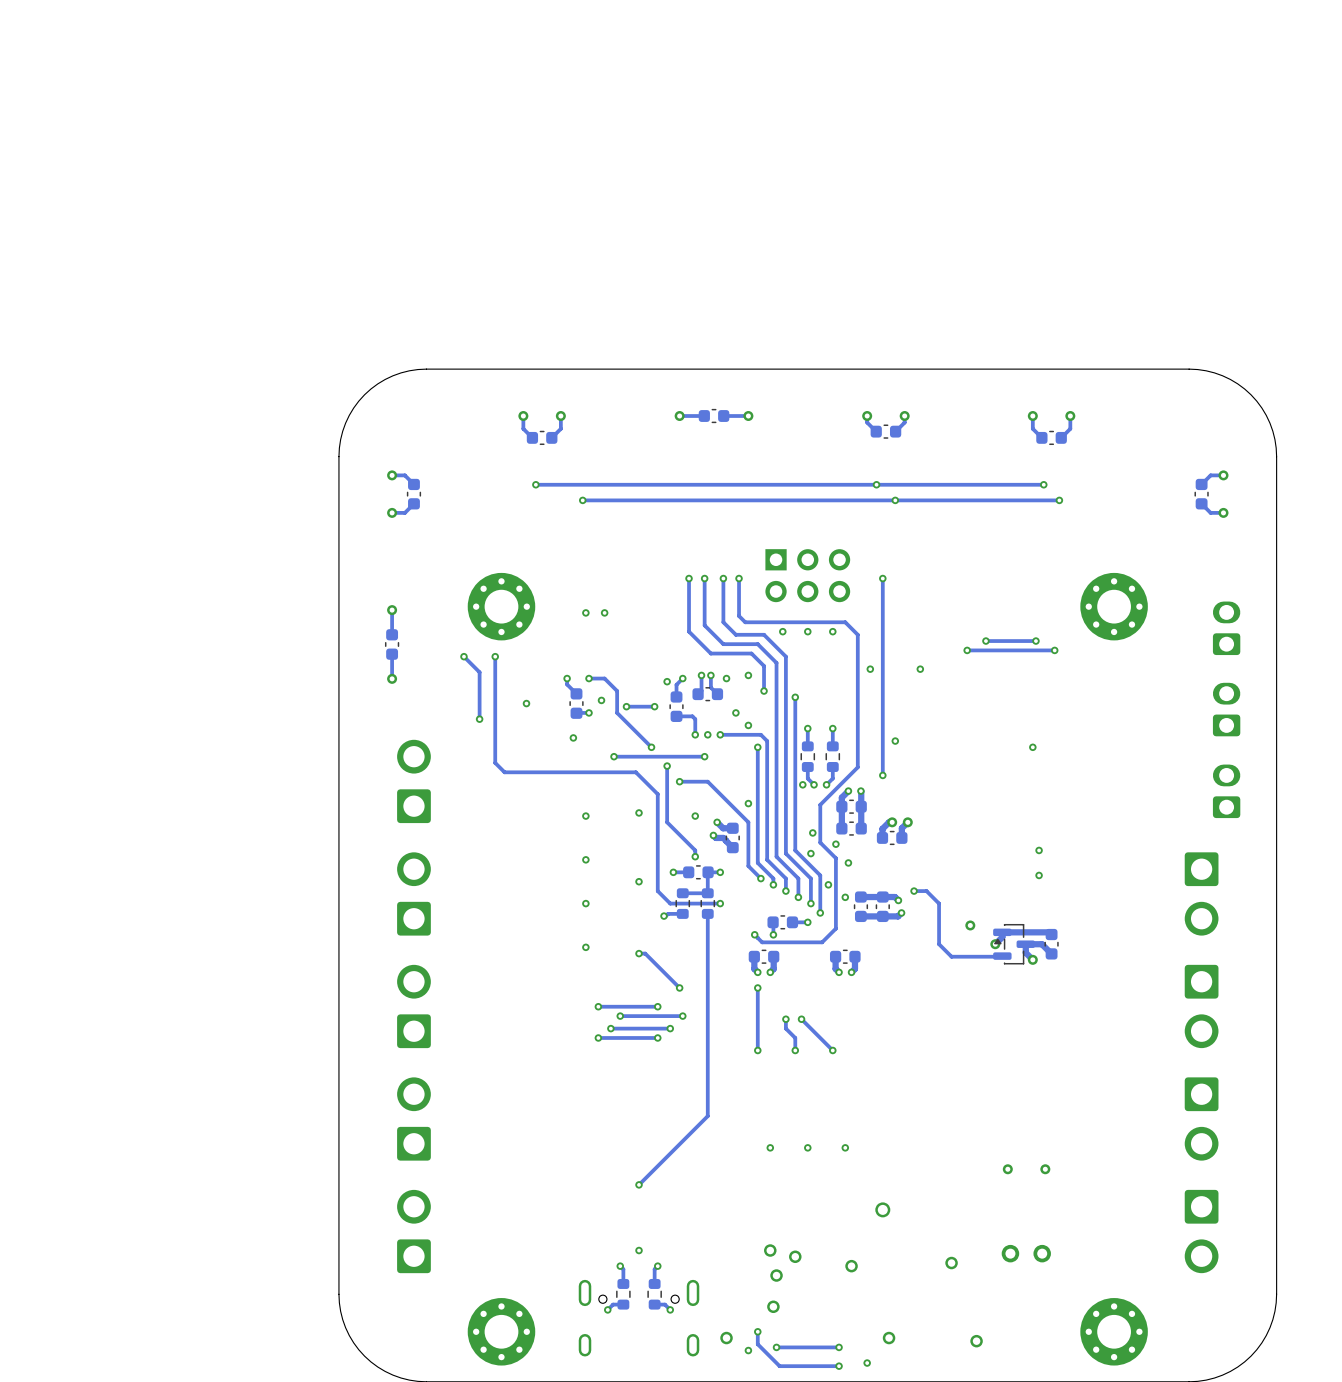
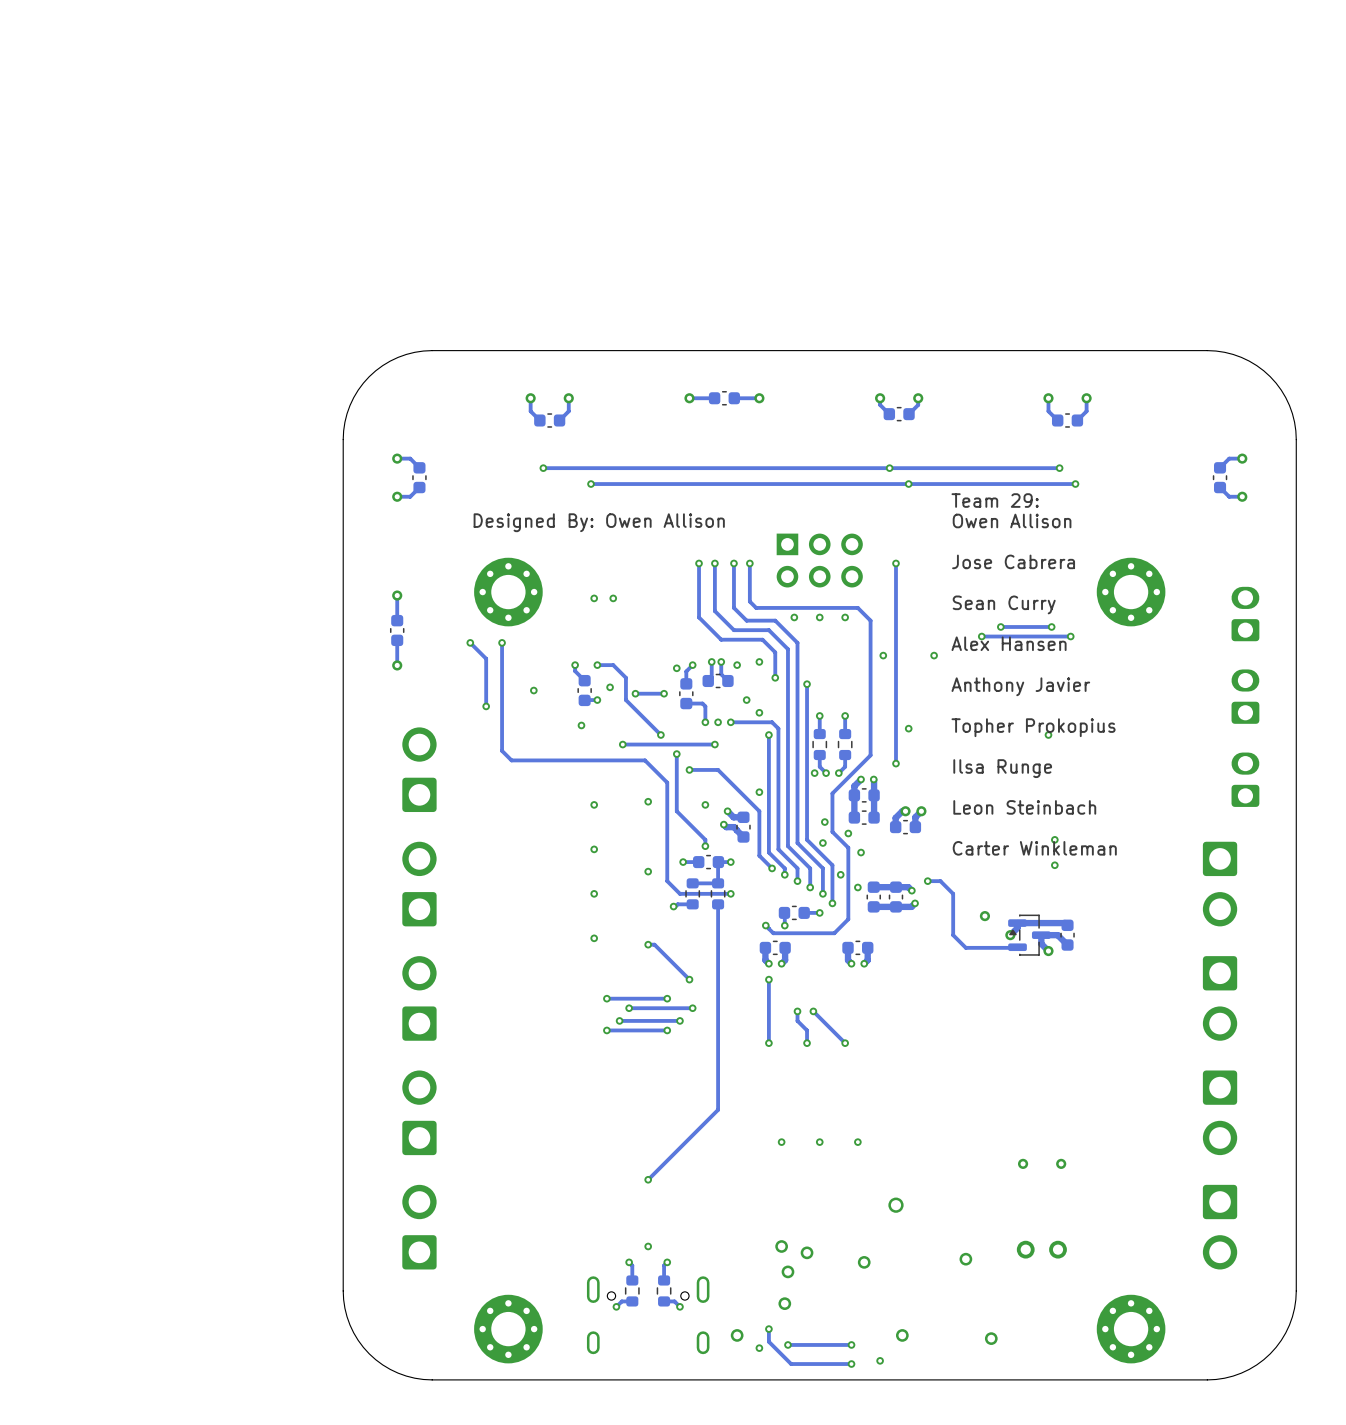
text: none -> Team 29: (995, 500)
text: none -> Owen Allison (1012, 520)
text: none -> Designed By: Owen Allison (599, 522)
text: none -> Jose Cabrera (1013, 561)
text: none -> Sean Curry (1004, 604)
text: none -> Alex Hansen (1009, 643)
text: none -> Anthony Javier (1020, 686)
text: none -> Topher Prokopius (1033, 727)
text: none -> Ilsa Runge (1002, 768)
text: none -> Leon Steinbach (1024, 807)
text: none -> Carter Winkleman (1034, 848)

